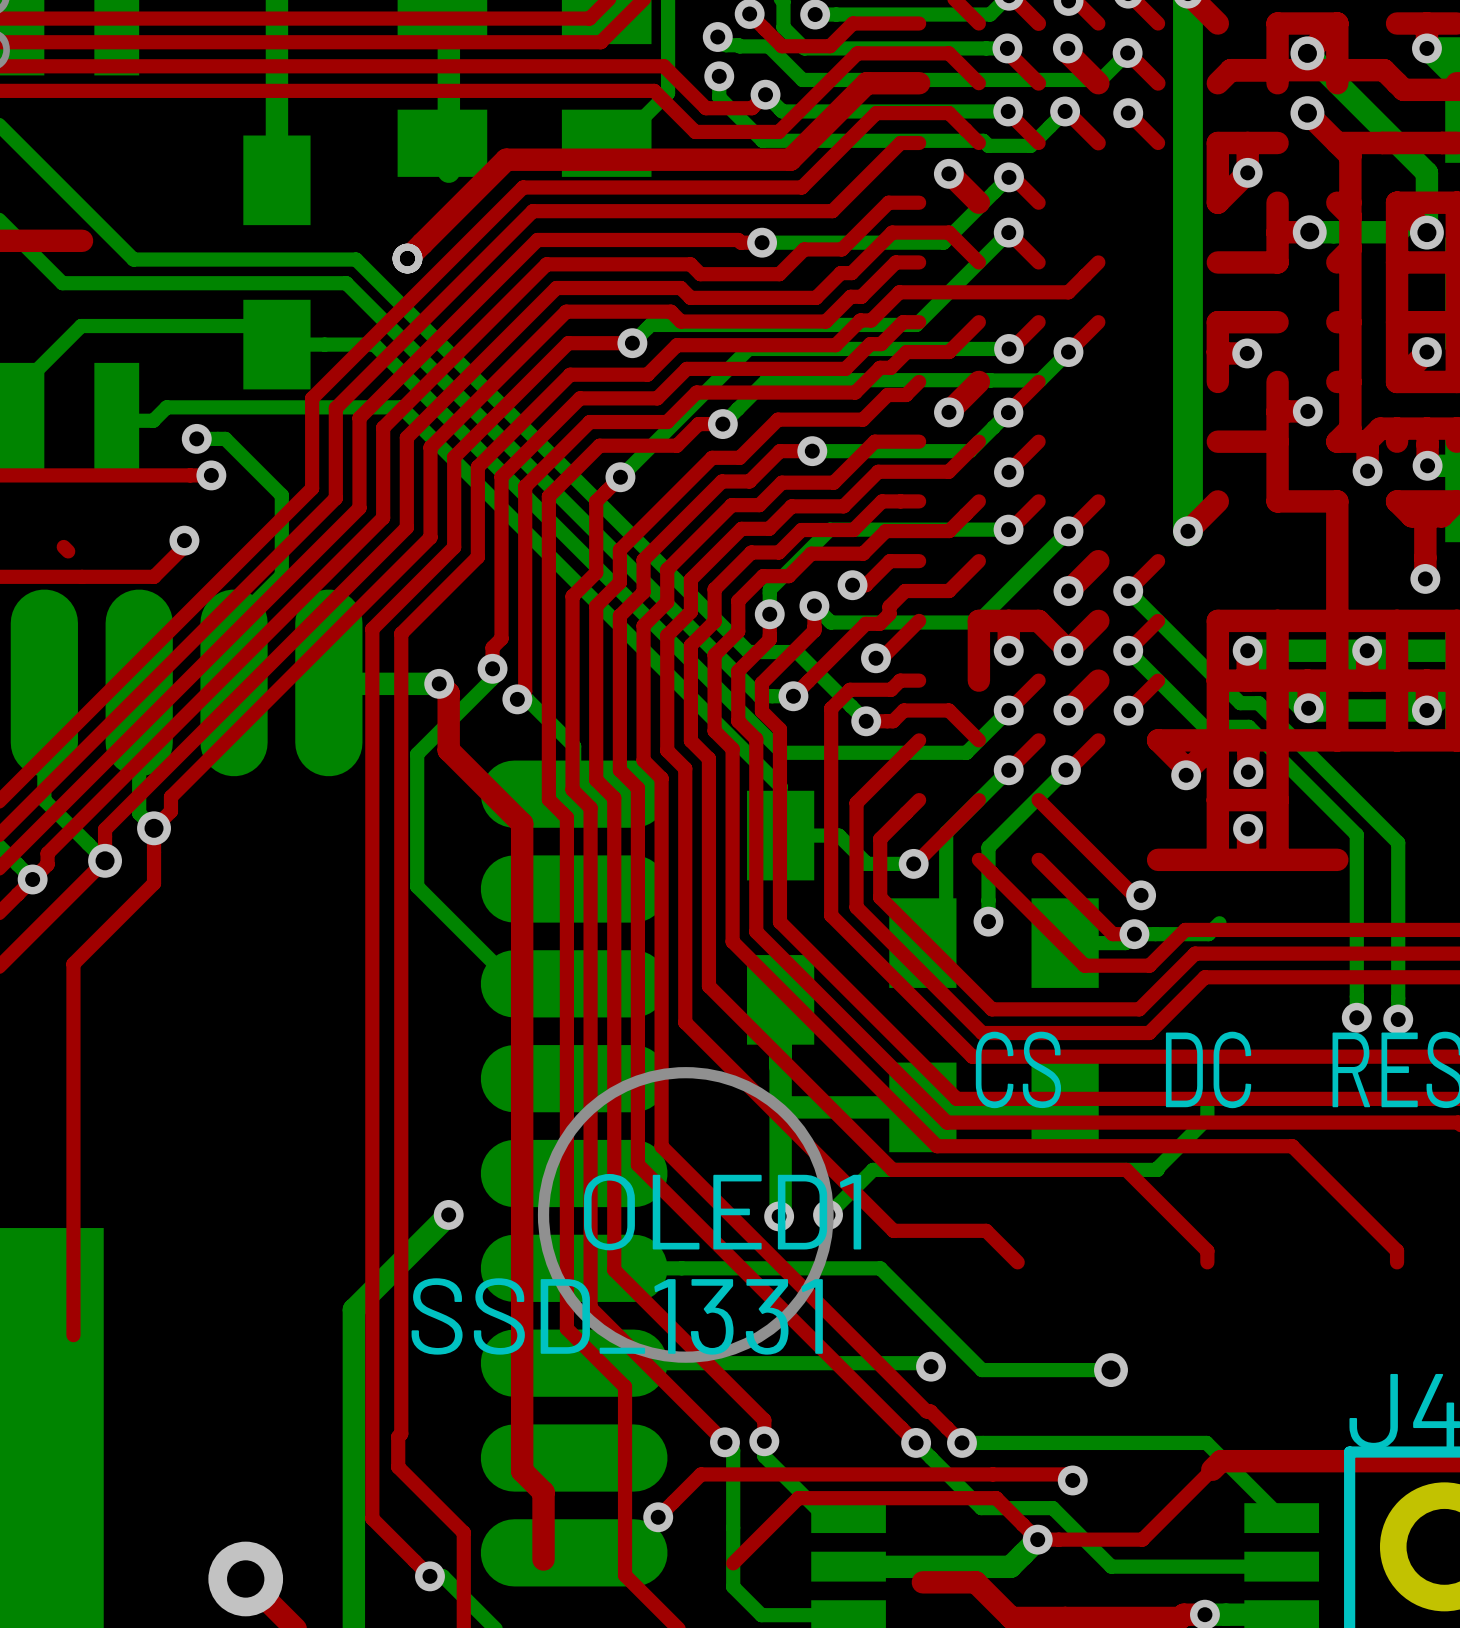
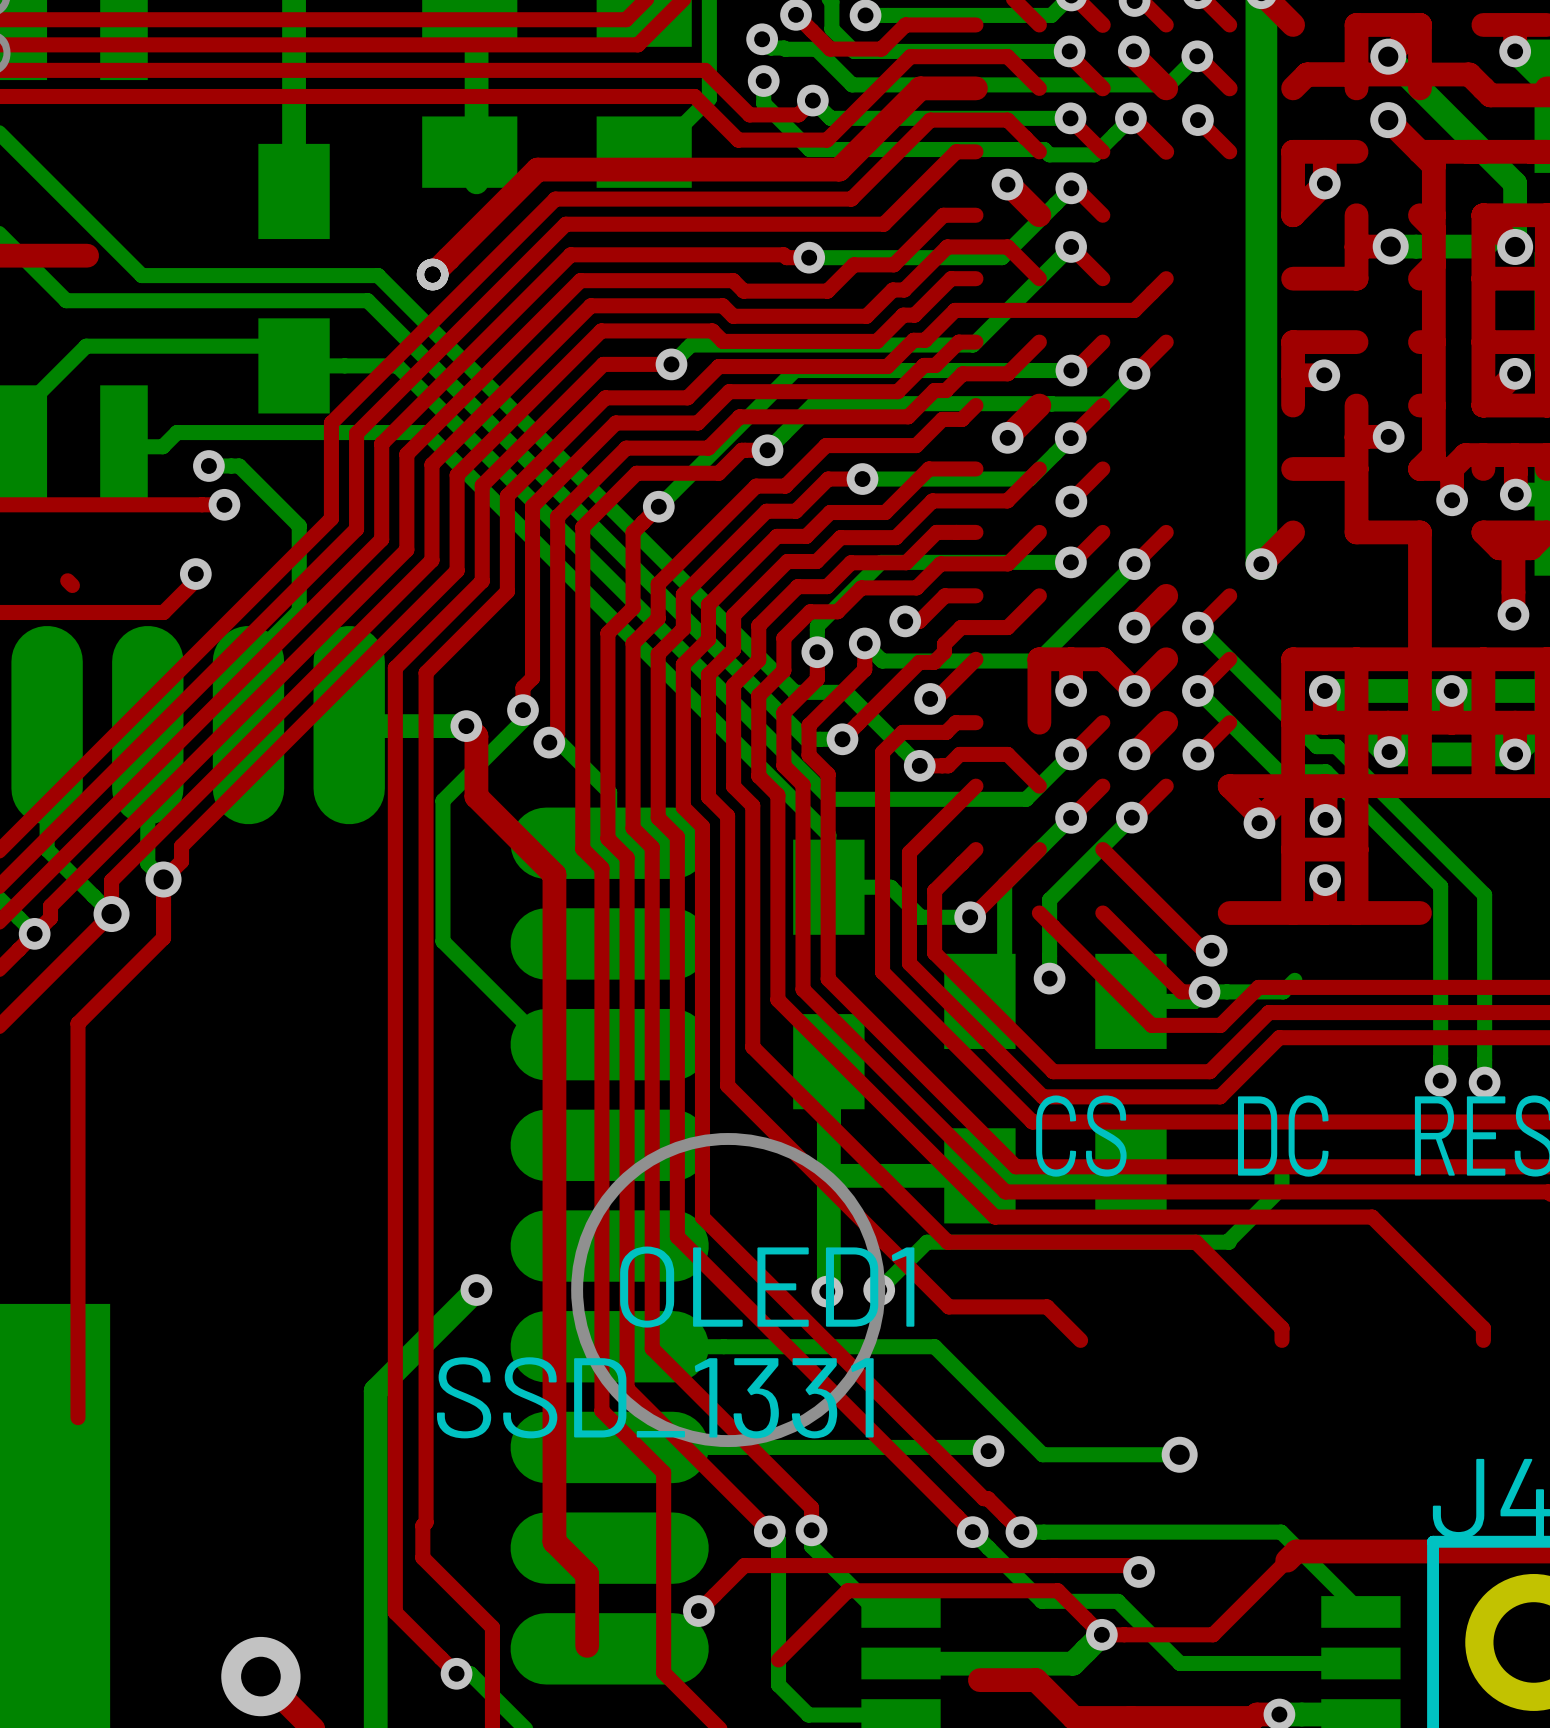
top track: (522, 1452) (522, 1470) (543, 1492) (543, 1559) -> (554, 1541) (587, 1574) (587, 1645)

